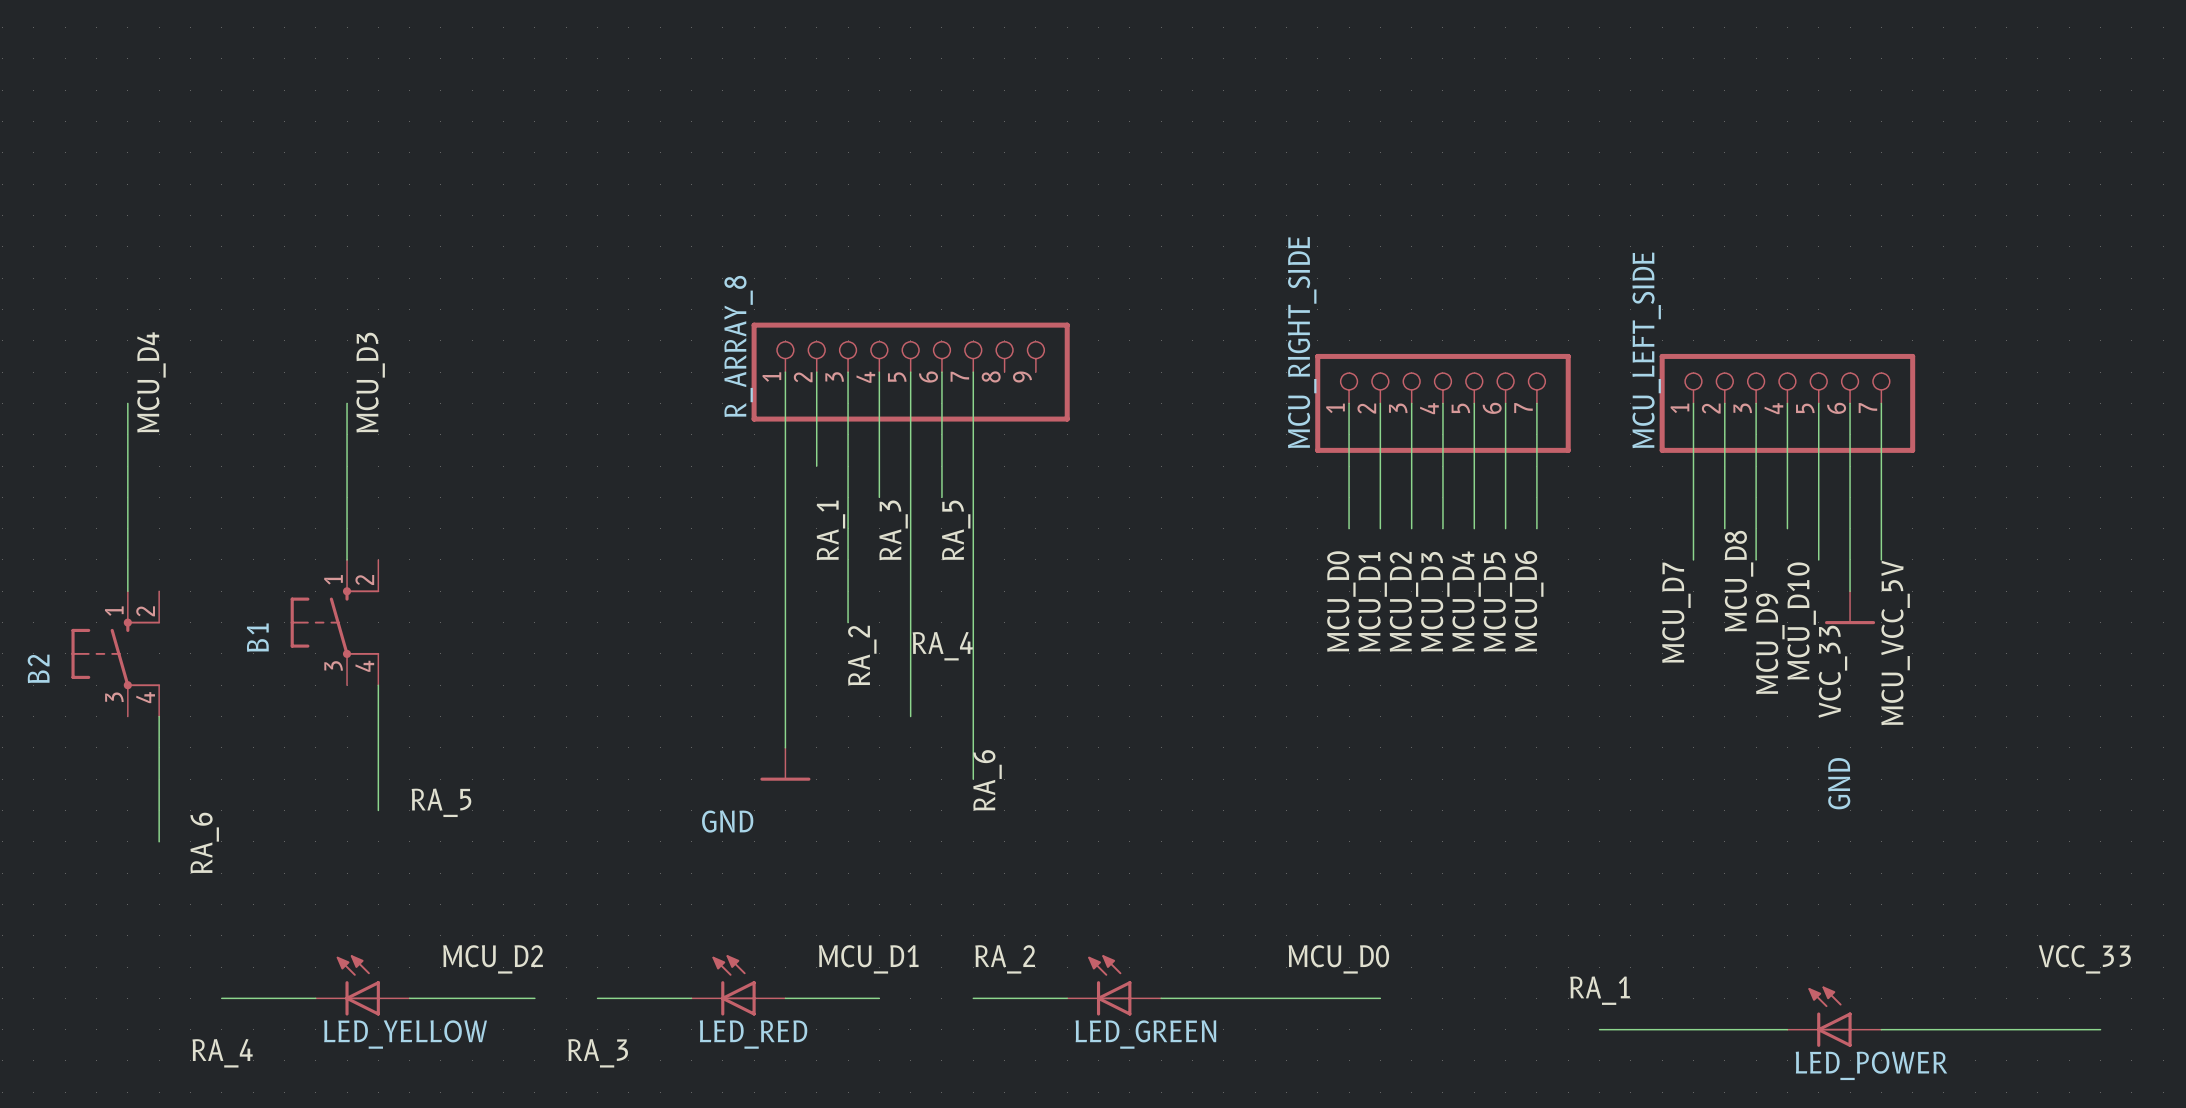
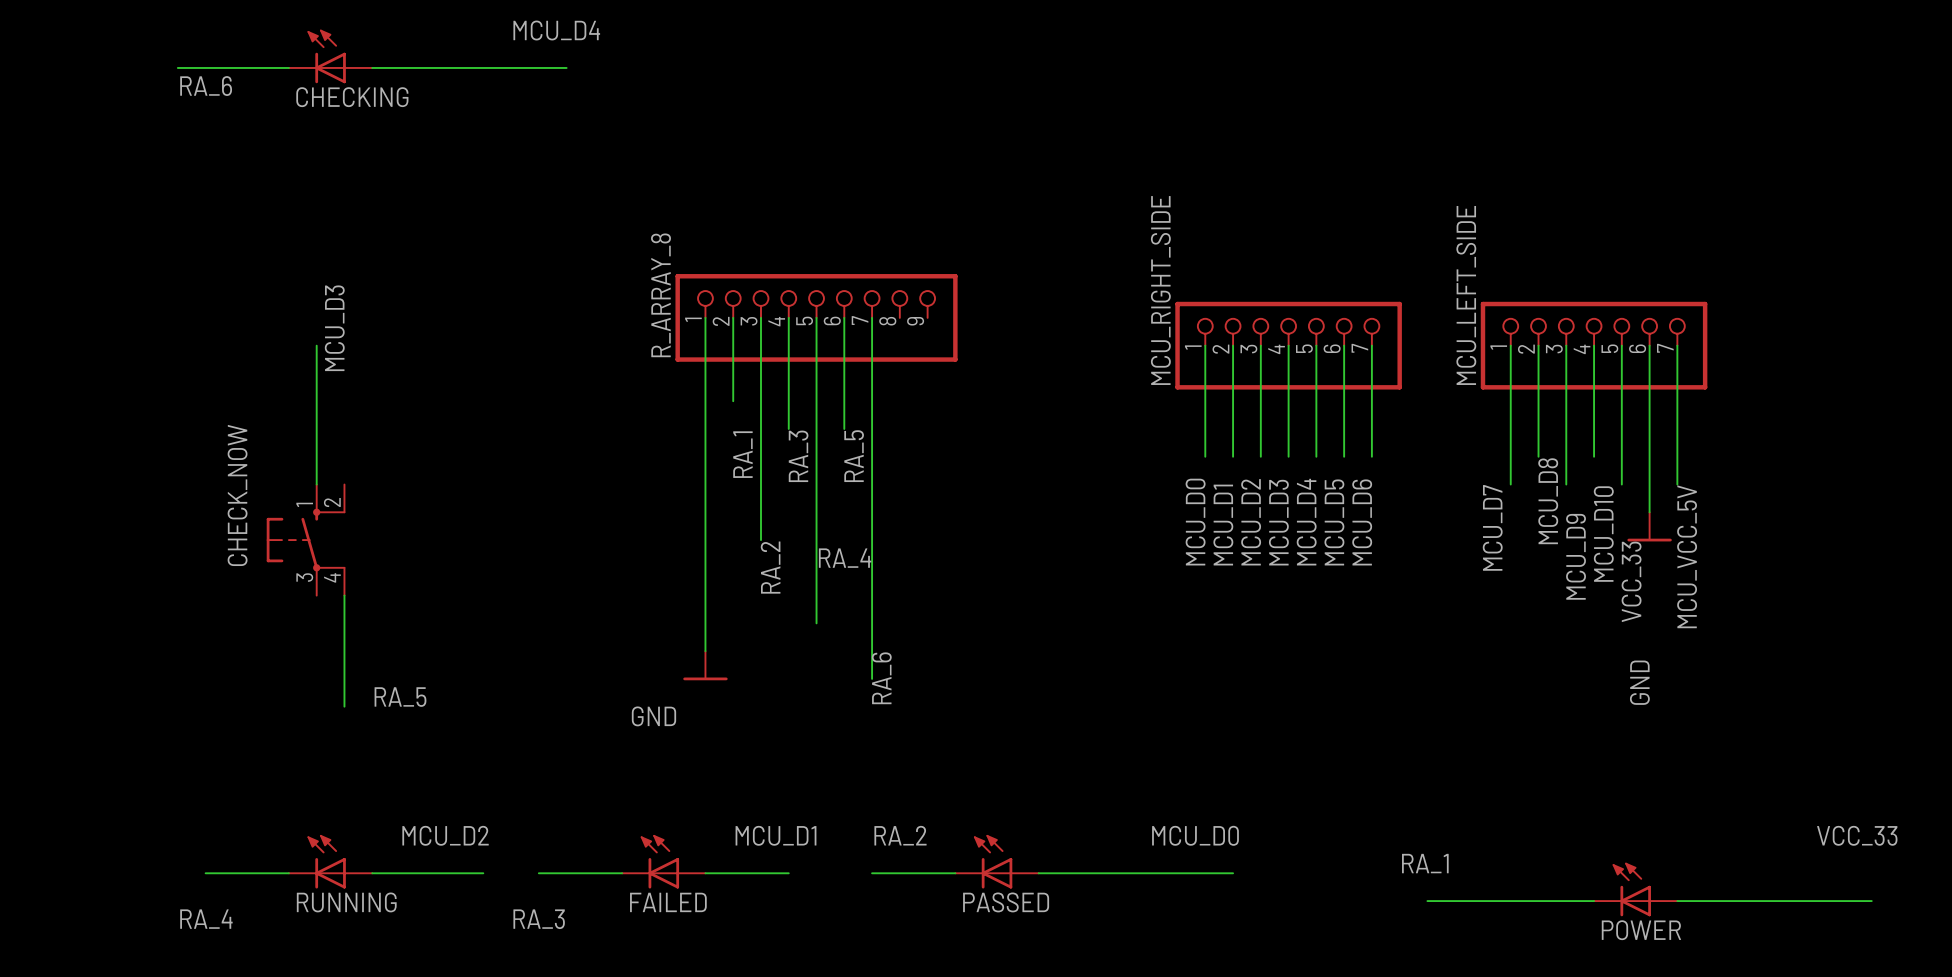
label: none -> MCU_D4 (556, 30)
CHECKING: none -> (330, 56)
wire: none -> (177, 67) (288, 67)
wire: none -> (372, 67) (566, 67)
label: none -> RA_6 (206, 86)
label: MCU_D4 (151, 382) -> none
wire: (127, 403) (127, 591) -> none
B1 name: B1 (257, 637) -> CHECK_NOW (237, 495)
B2: (115, 653) -> none
wire: (159, 716) (159, 841) -> none
label: RA_6 (204, 843) -> none
LED_YELLOW name: LED_YELLOW (405, 1034) -> RUNNING (346, 902)
LED_RED name: LED_RED (753, 1034) -> FAILED (668, 902)
LED_GREEN name: LED_GREEN (1145, 1034) -> PASSED (1006, 902)
LED_POWER name: LED_POWER (1871, 1065) -> POWER (1641, 930)

